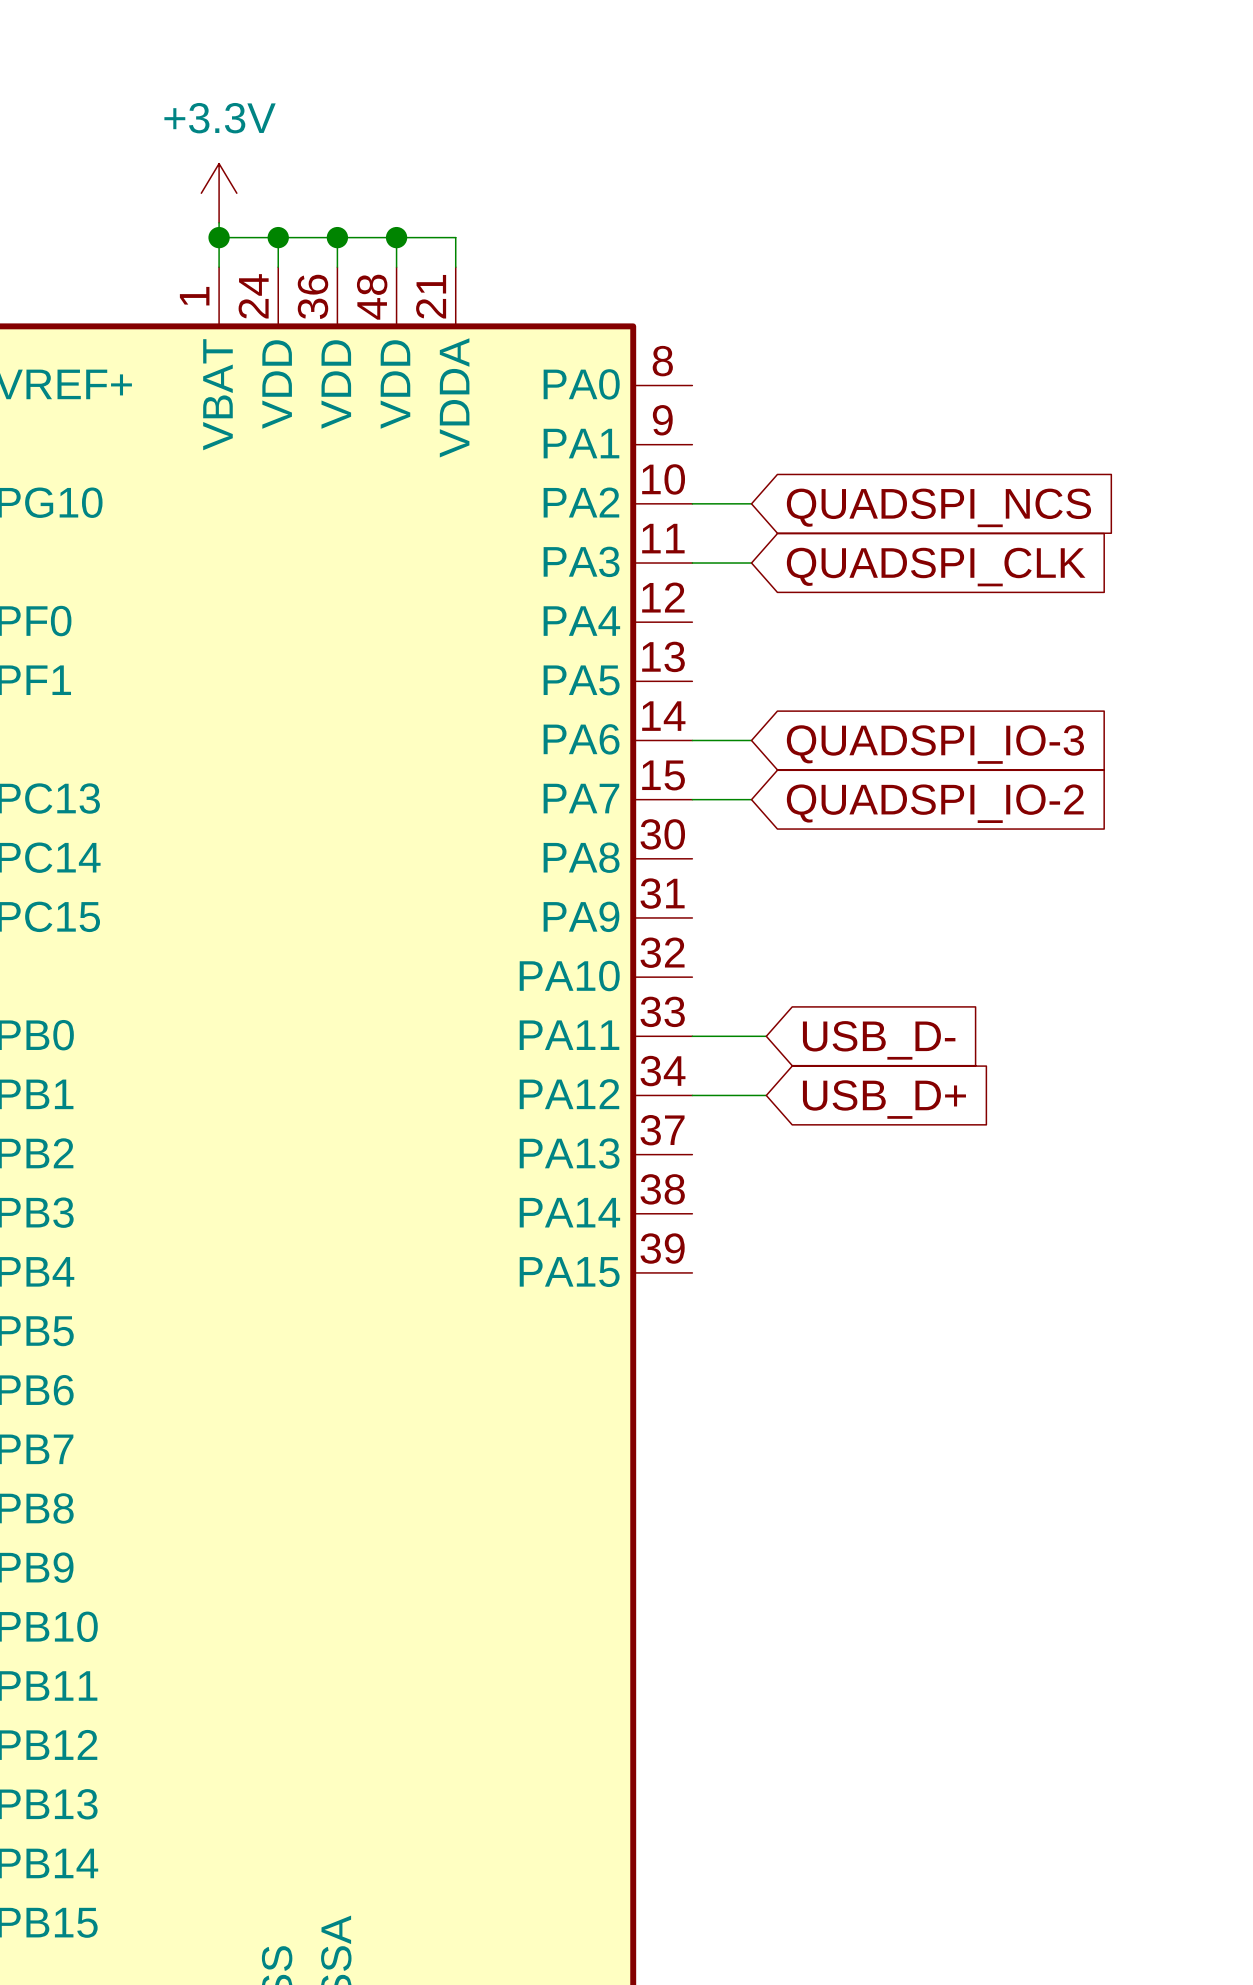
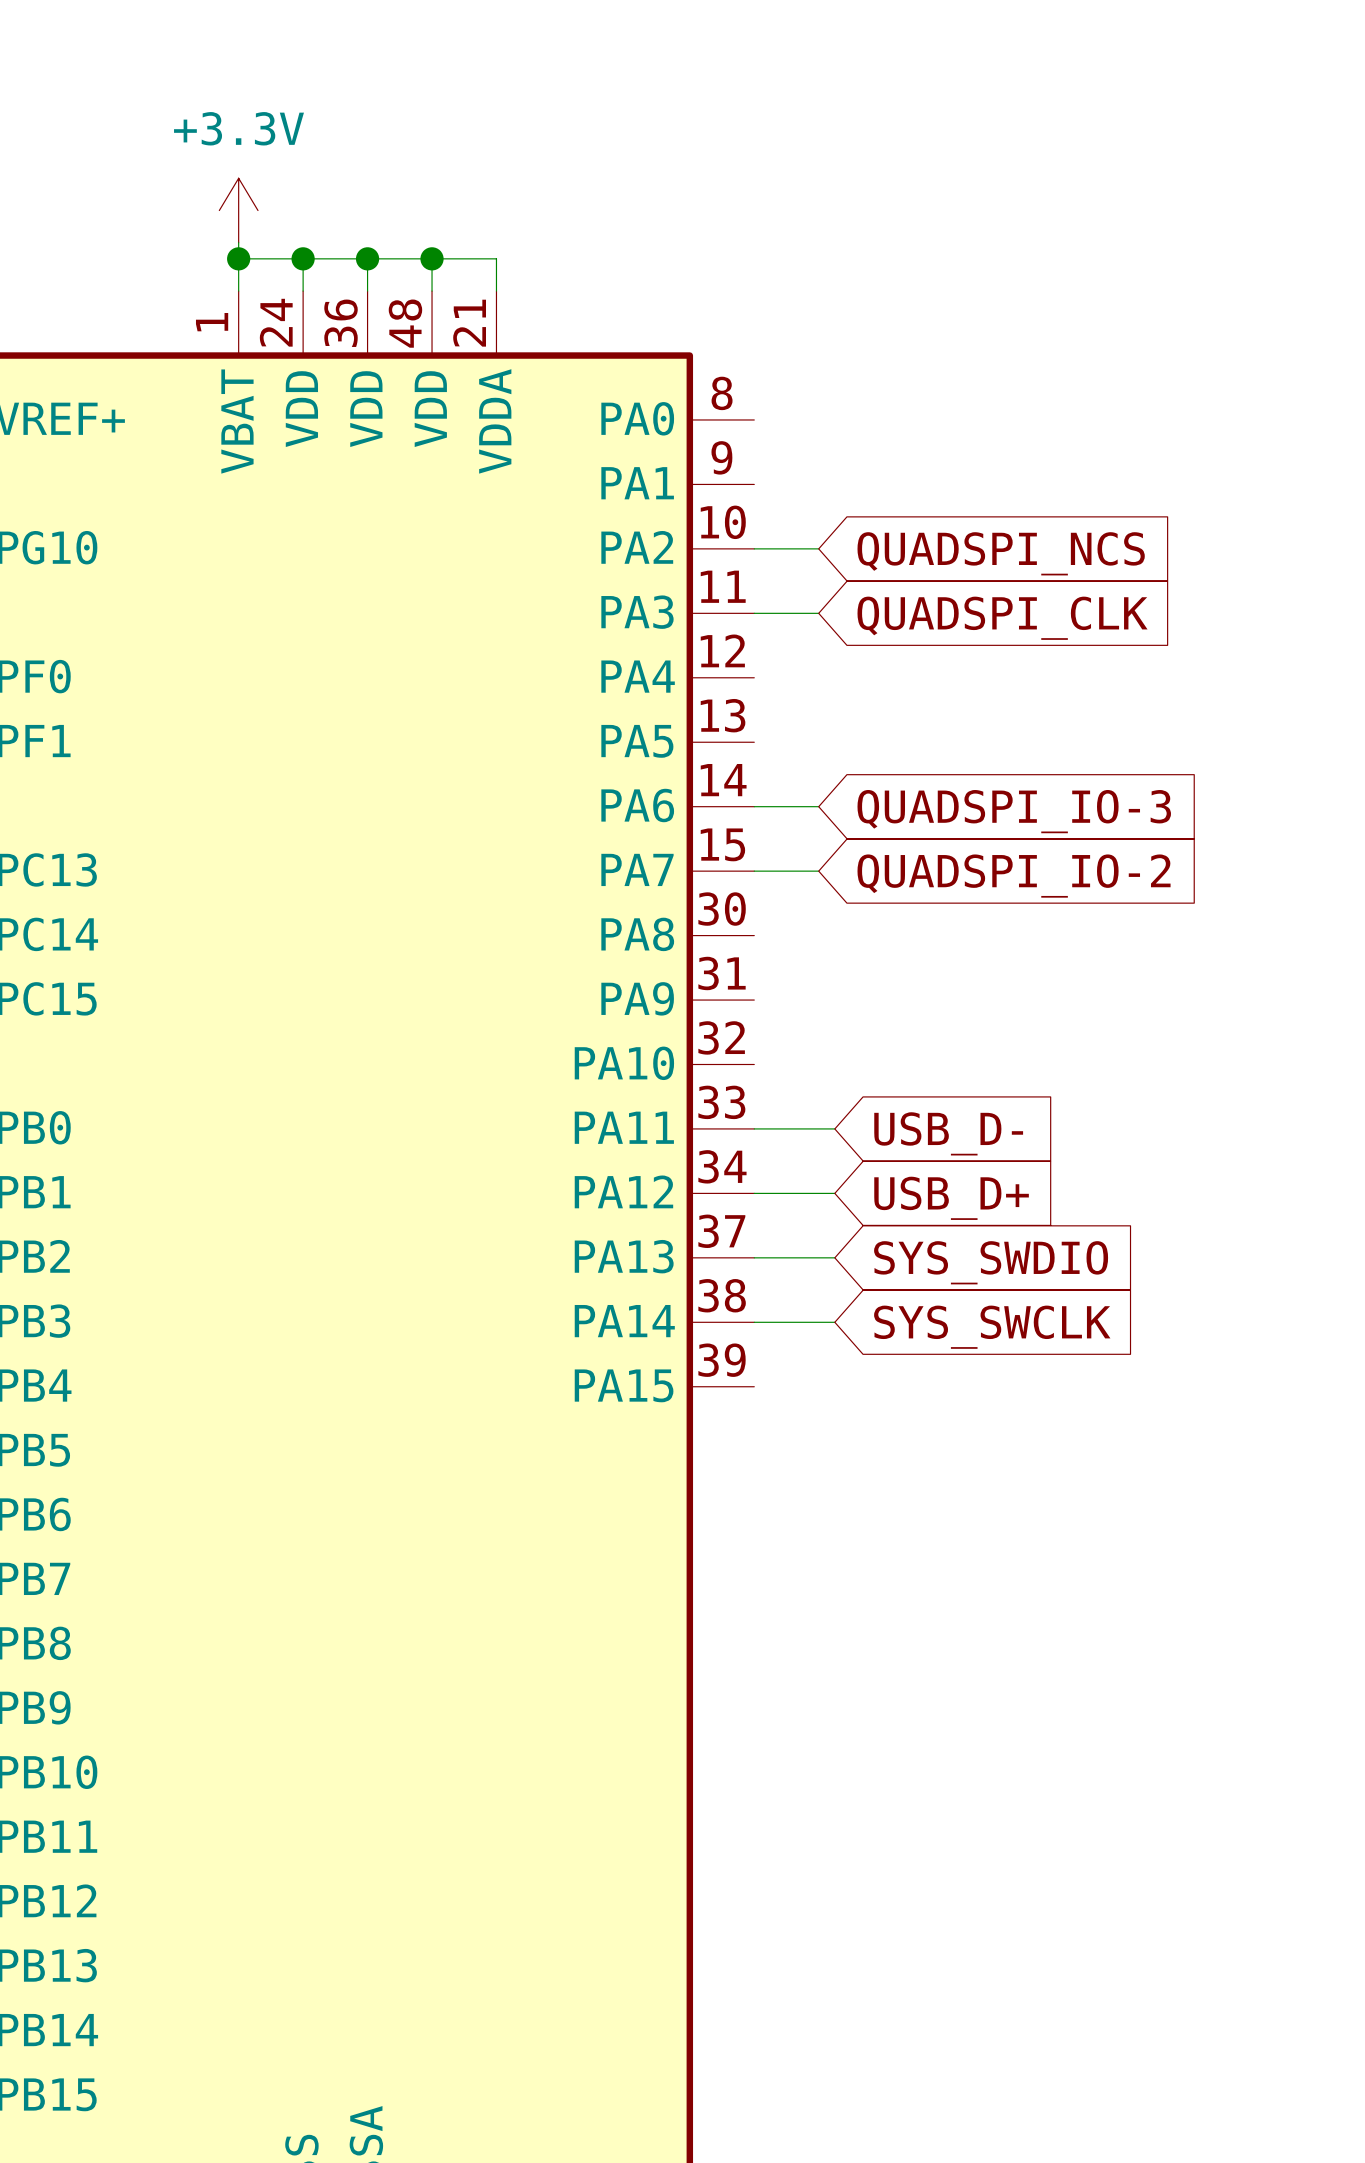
wire: none -> (754, 1257) (834, 1257)
global label: none -> SYS_SWDIO (991, 1262)
wire: none -> (754, 1322) (834, 1322)
global label: none -> SYS_SWCLK (992, 1327)

